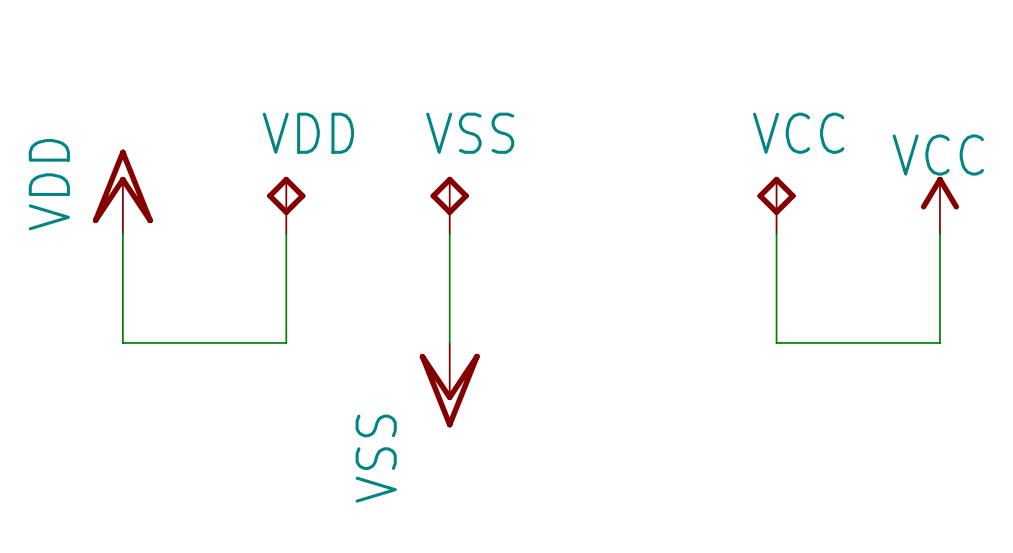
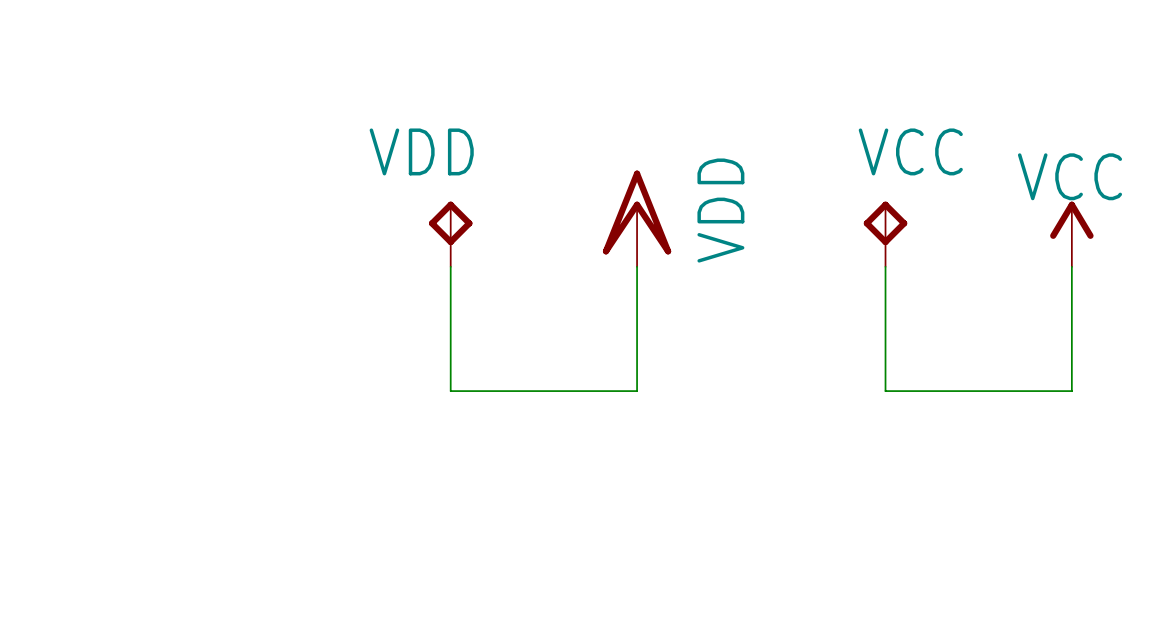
VDD name position: VDD (308, 133) -> VDD (421, 151)
power symbol text position: VDD (49, 184) -> VDD (720, 210)
power symbol position: VDD (122, 191) -> VDD (637, 218)
VDD position: (286, 205) -> (450, 234)
VSS: (449, 205) -> none
wire: (122, 234) (122, 342) (286, 342) (286, 234) -> (450, 266) (450, 391) (637, 391) (637, 266)
wire: (449, 234) (449, 342) -> none
power symbol: VSS (449, 385) -> none

